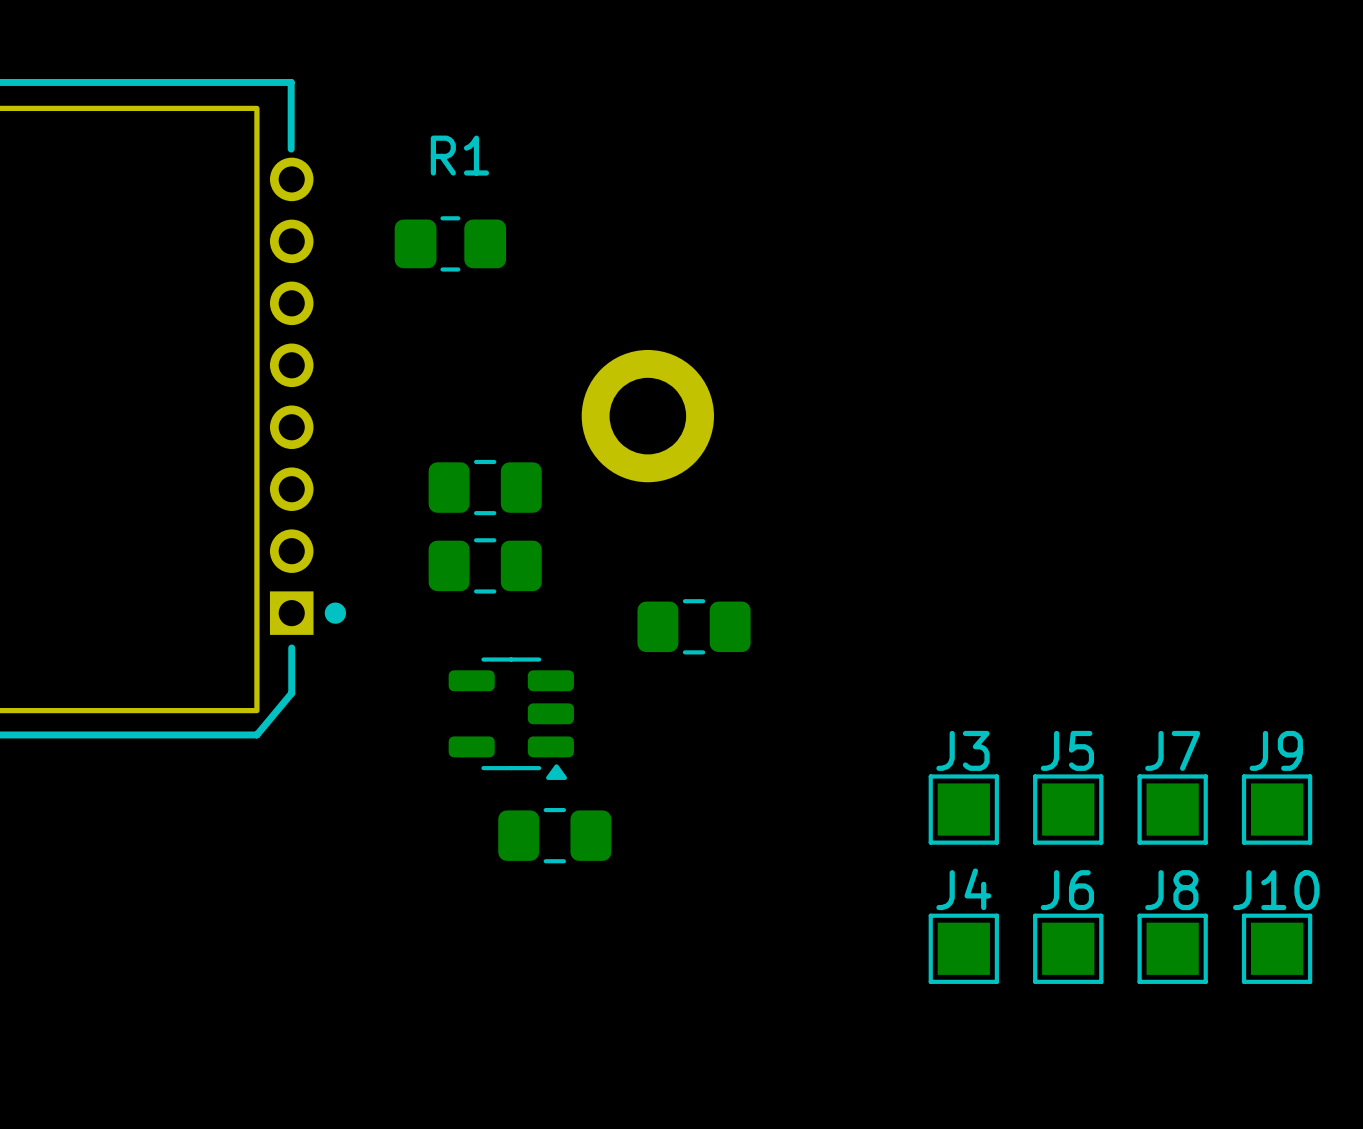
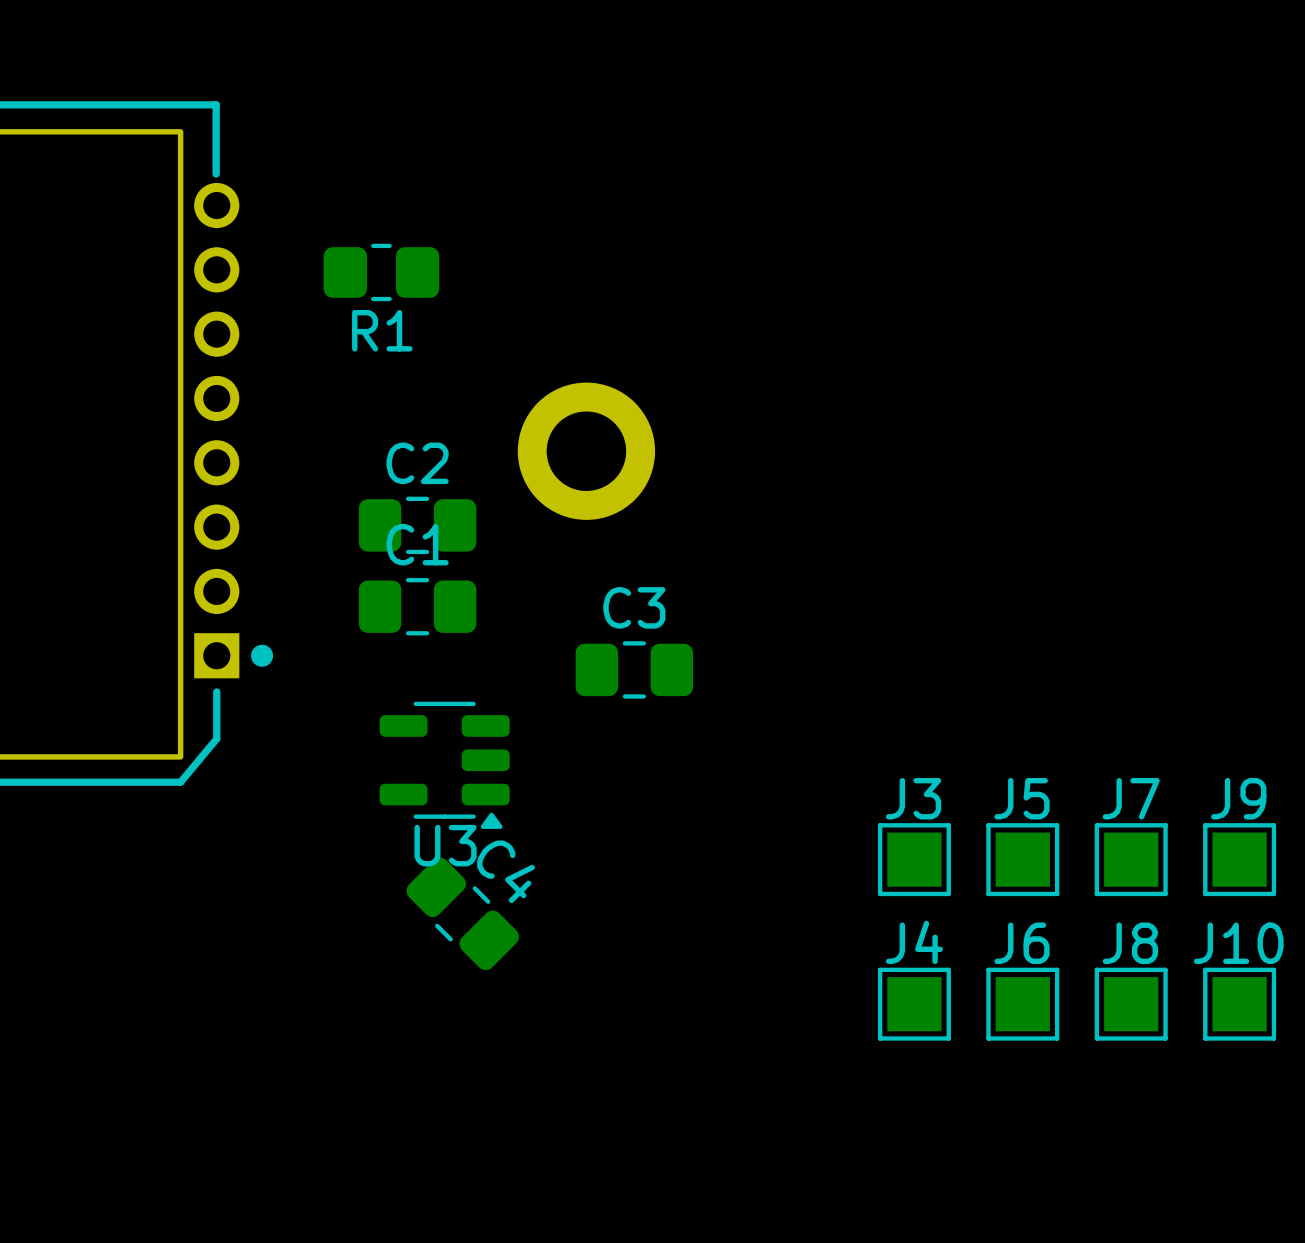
R1 name position: R1 (459, 155) -> R1 (382, 330)
C2 name: none -> C2 (417, 463)
C1 name: none -> C1 (417, 544)
C3 name: none -> C3 (634, 607)
U3 name: none -> U3 (445, 845)
part: (554, 835) -> none
C4: none -> (462, 913)

